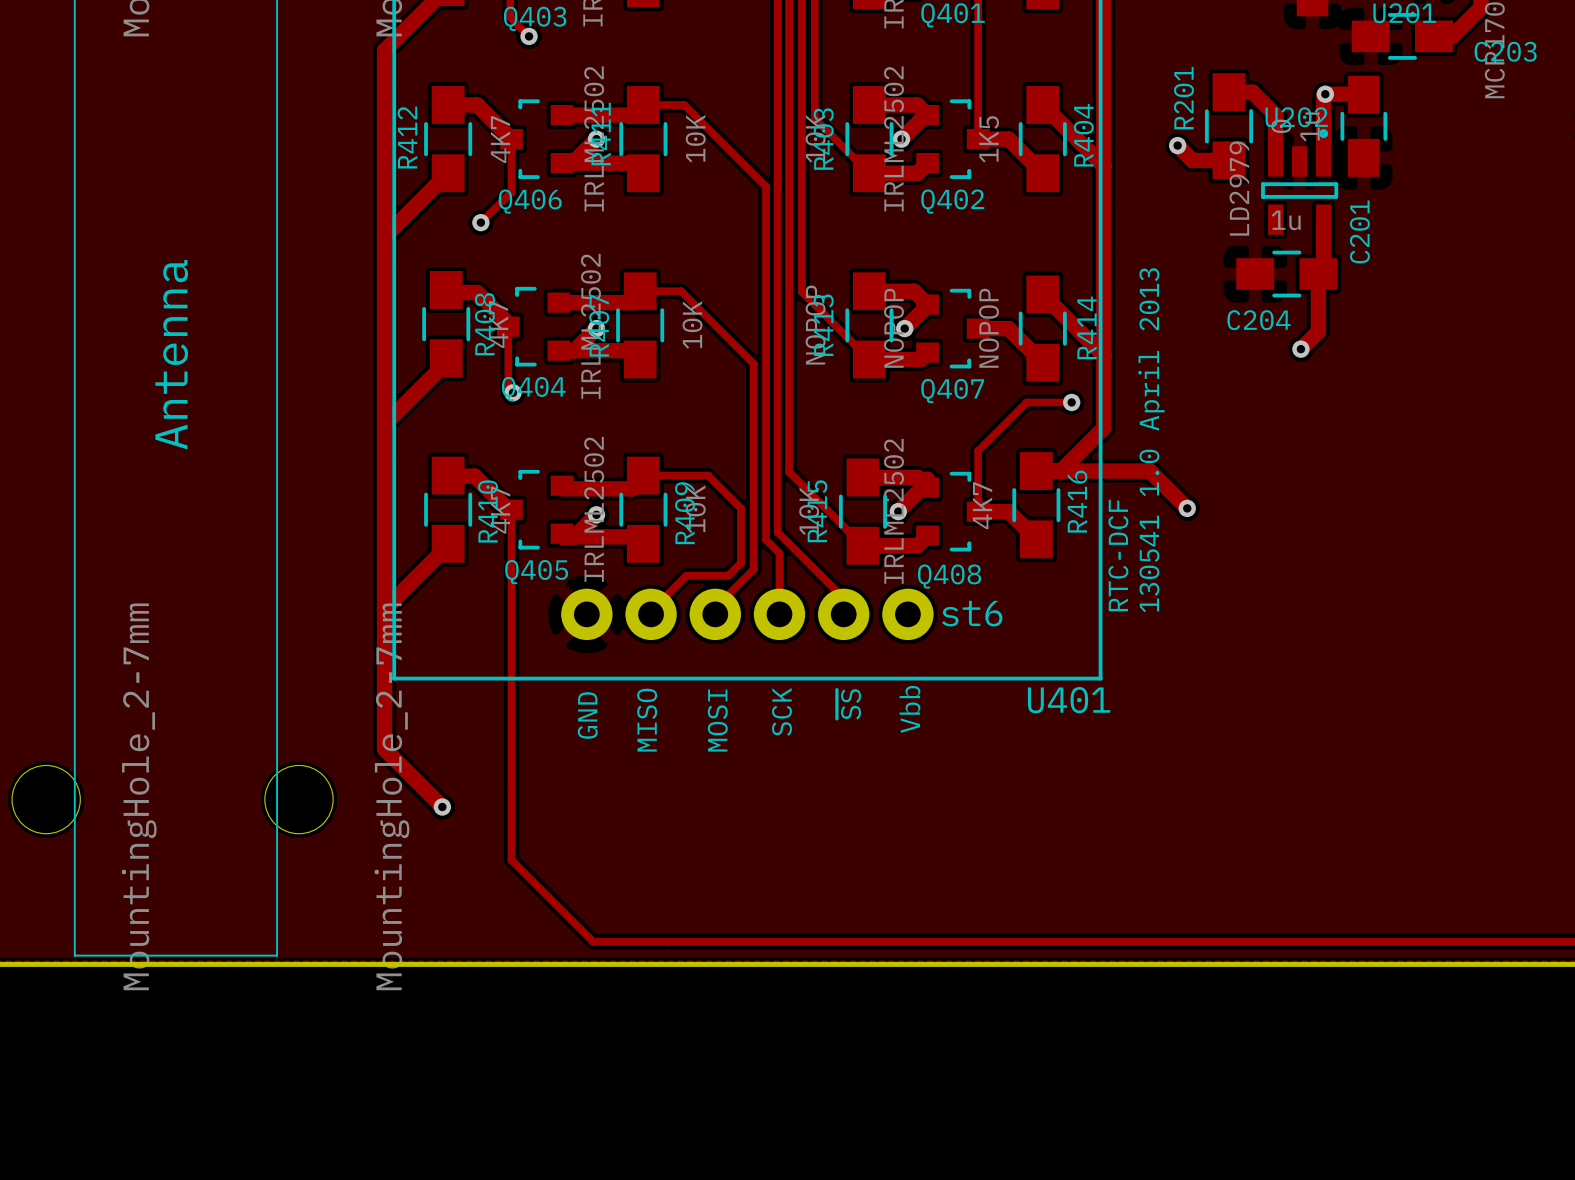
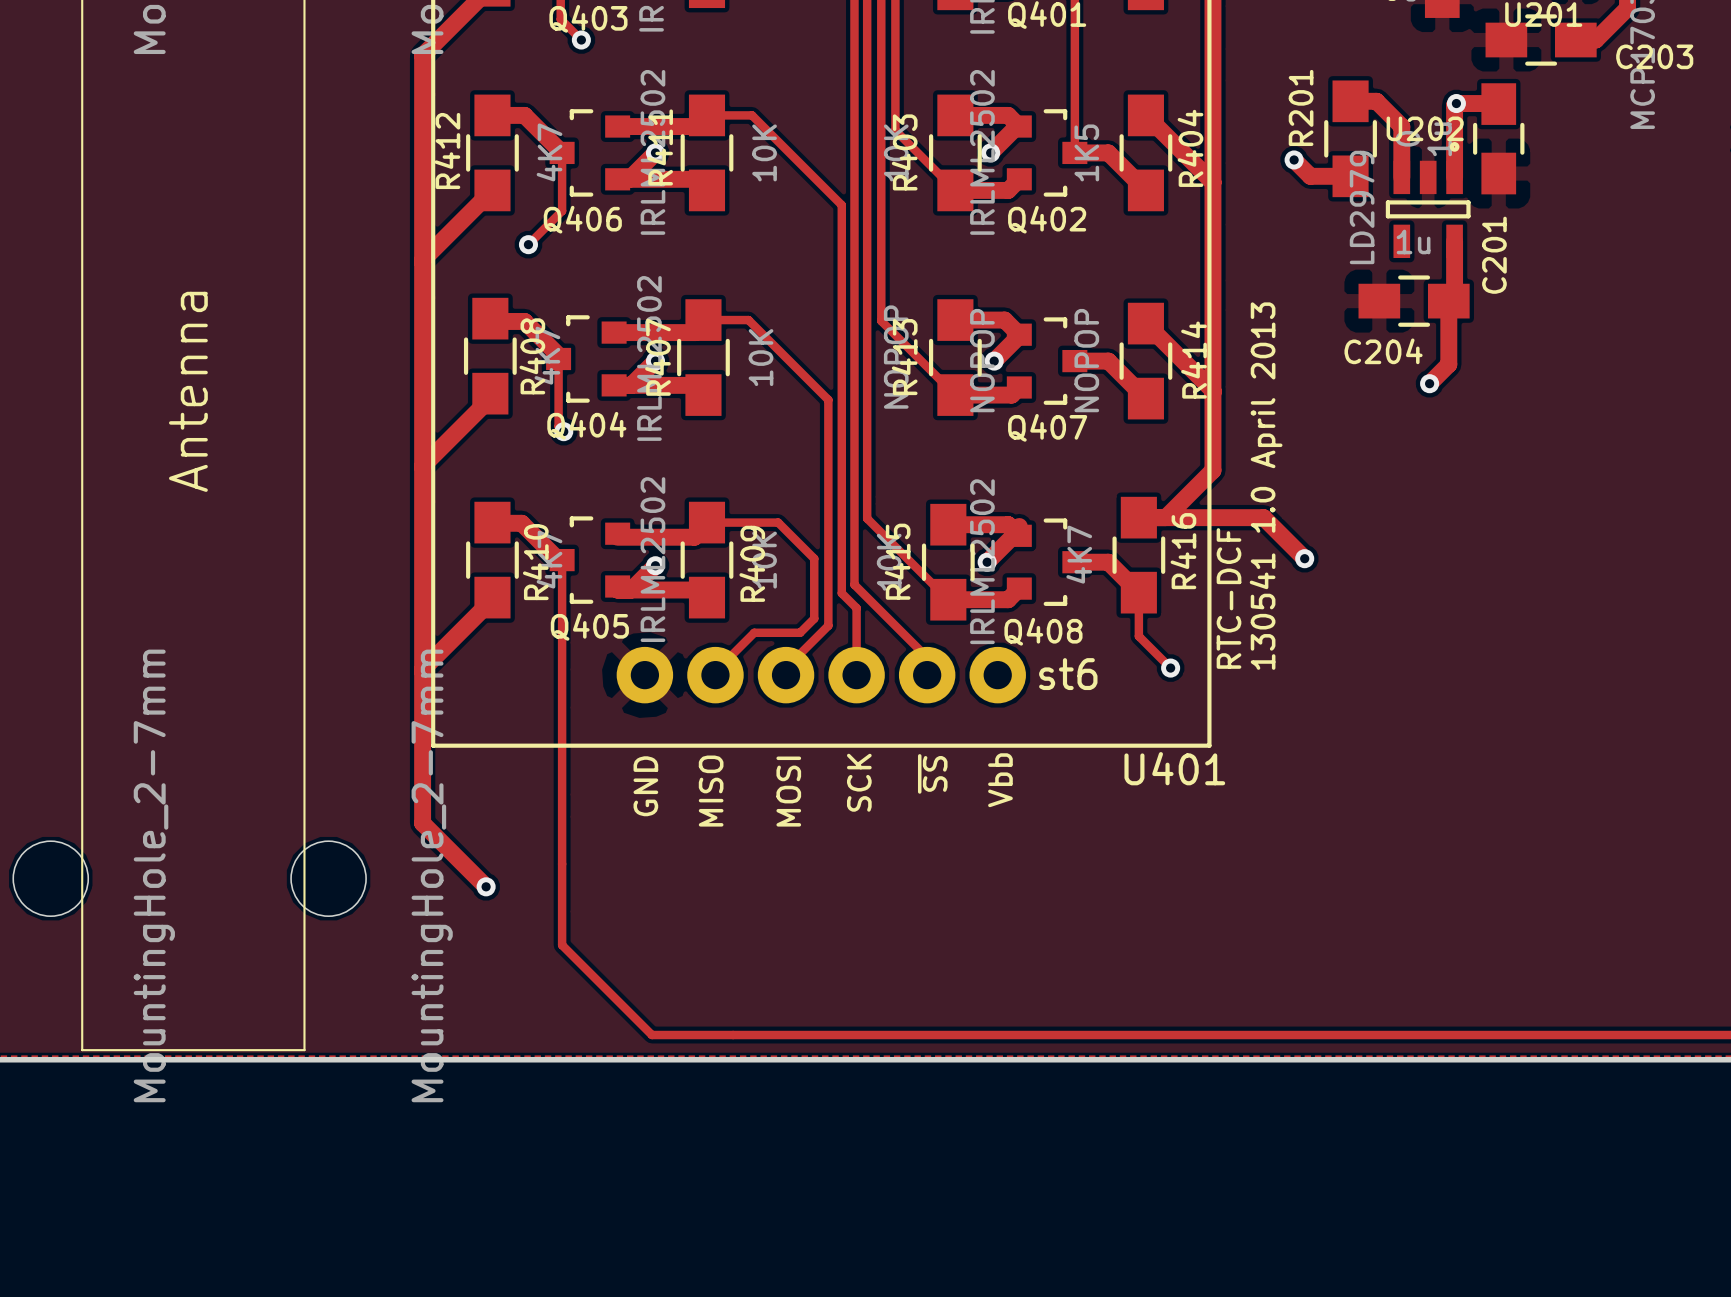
track: (1071, 402) (1026, 402) (978, 451) (978, 511) -> none
via: (1071, 402) -> none
track: none -> (1138, 592) (1138, 636) (1170, 668)
via: none -> (1170, 668)

